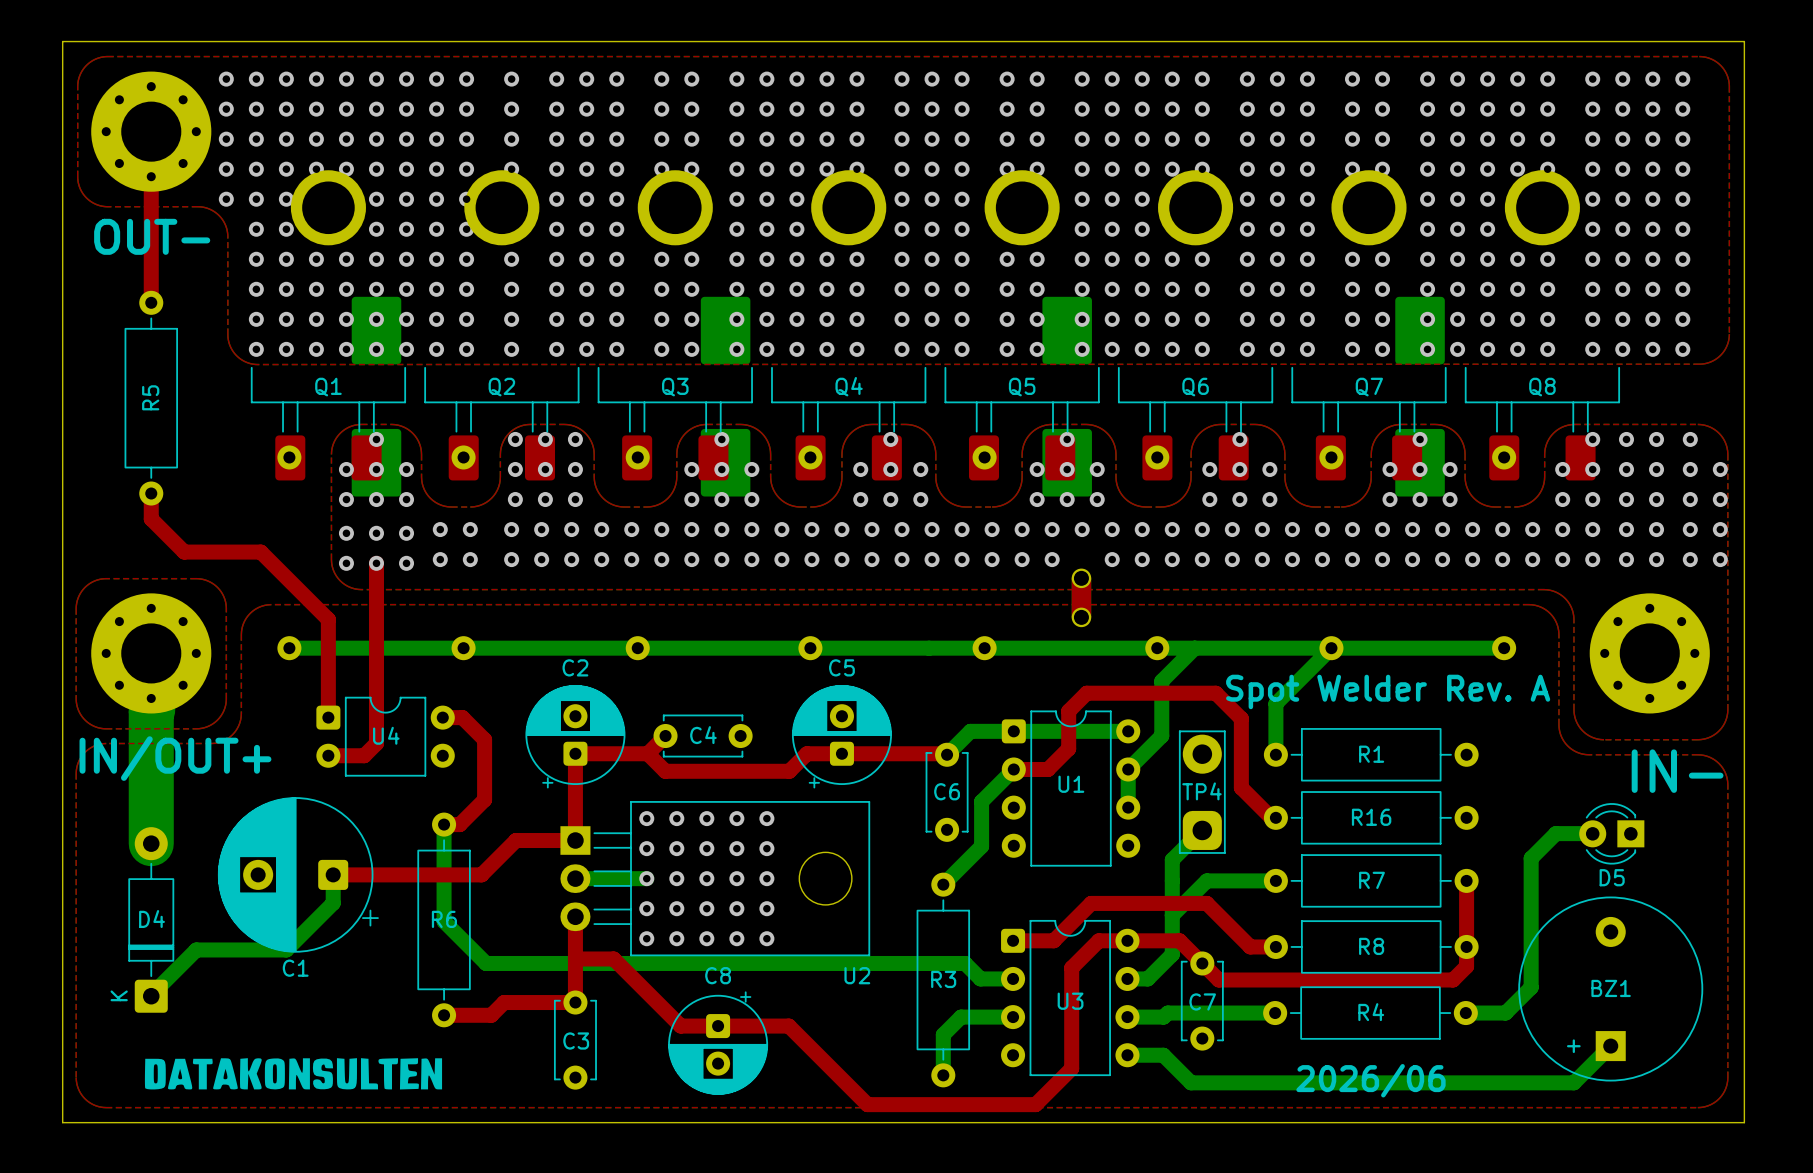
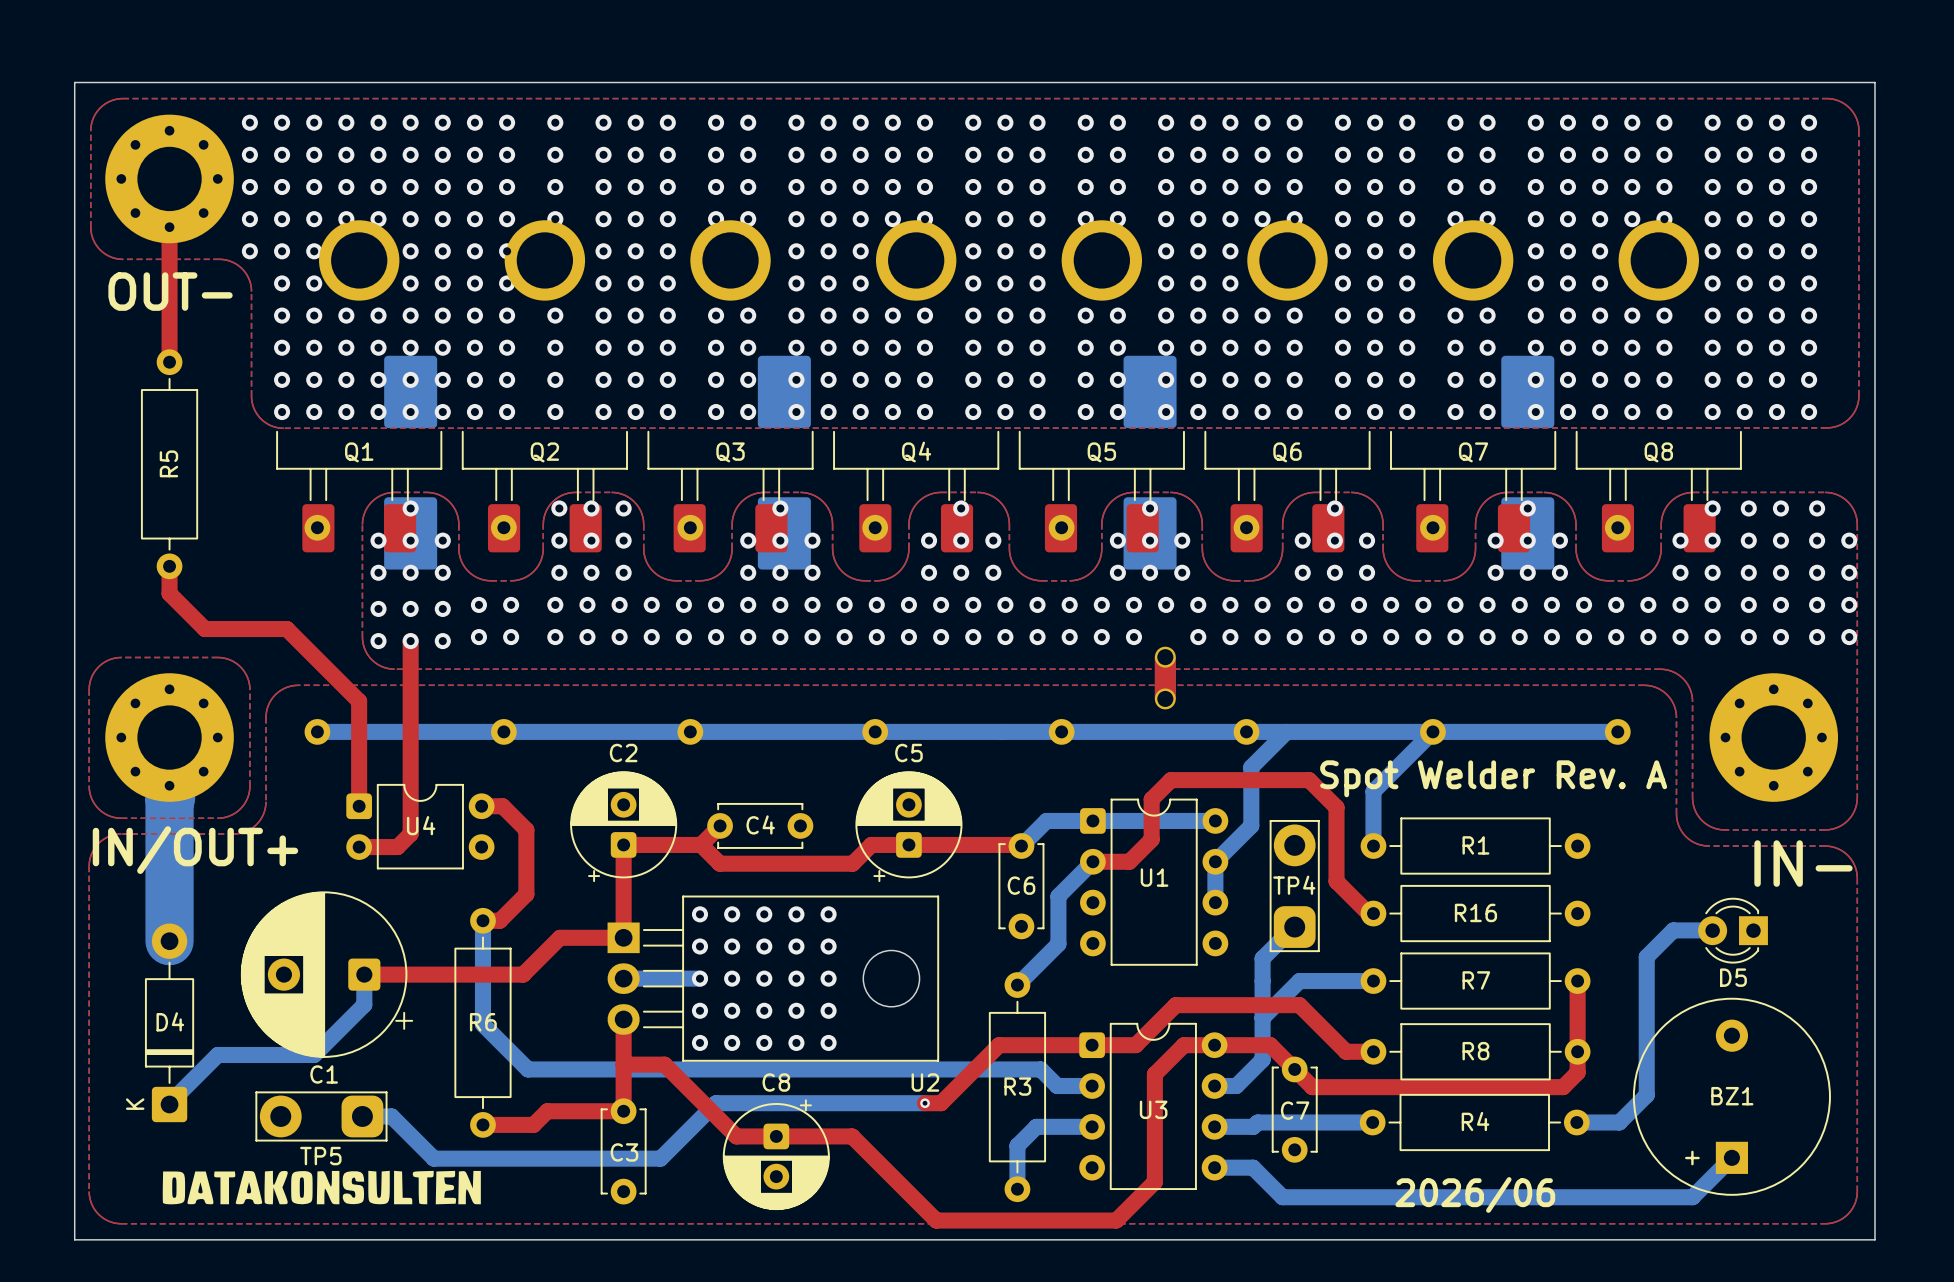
top track: none -> (1092, 1045) (999, 1045) (941, 1103) (925, 1103)
bottom track: none -> (925, 1103) (716, 1103) (660, 1158) (433, 1158) (391, 1116) (362, 1116)
via: none -> (925, 1103)
TP5: none -> (321, 1116)

